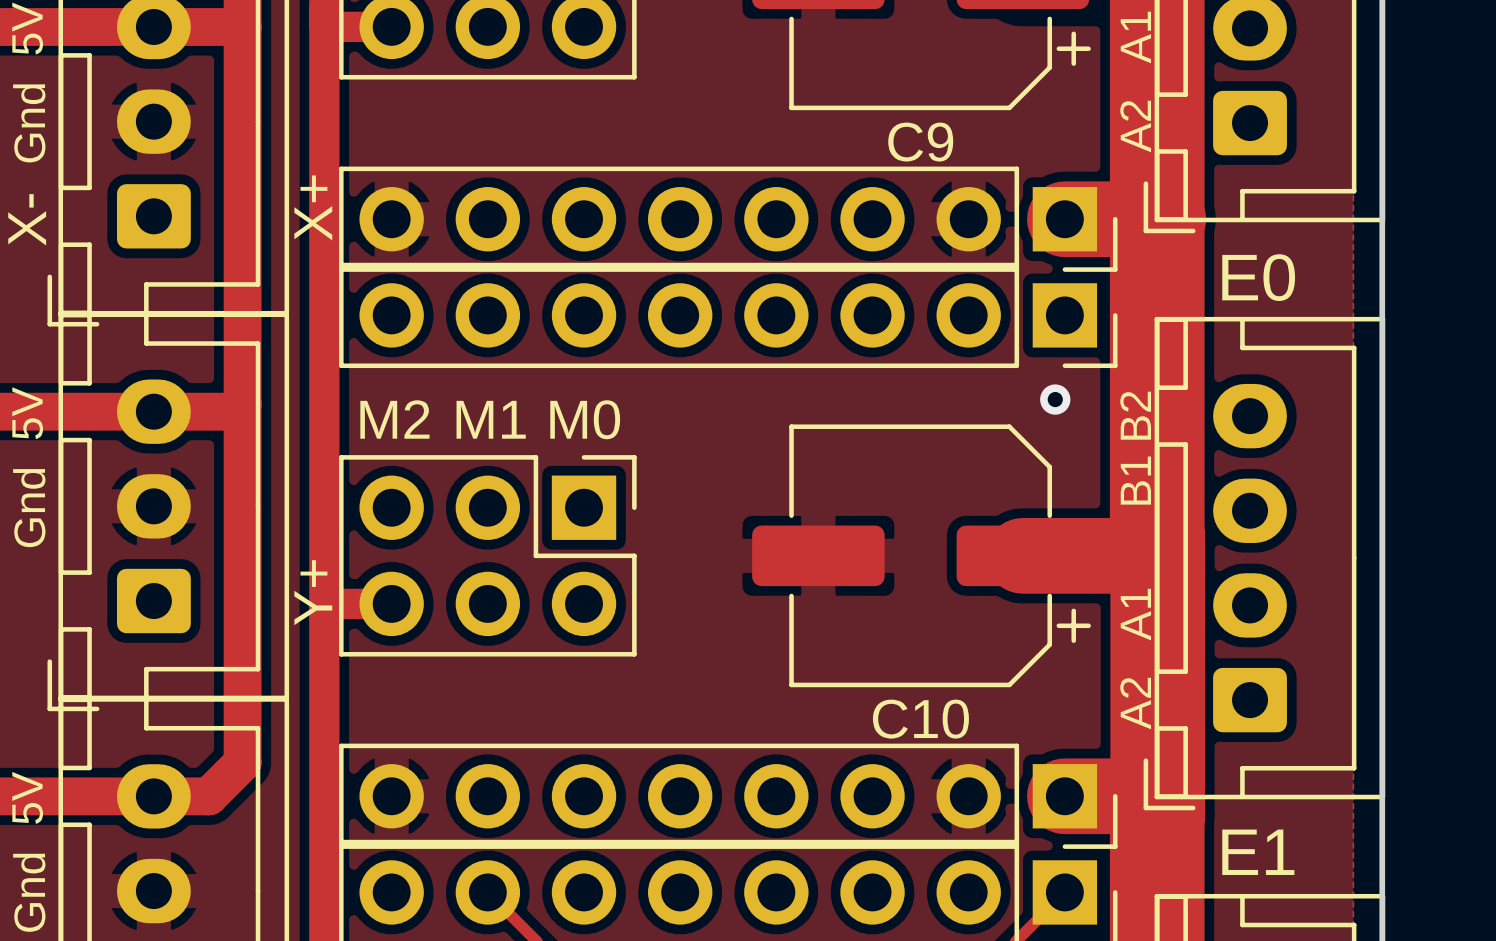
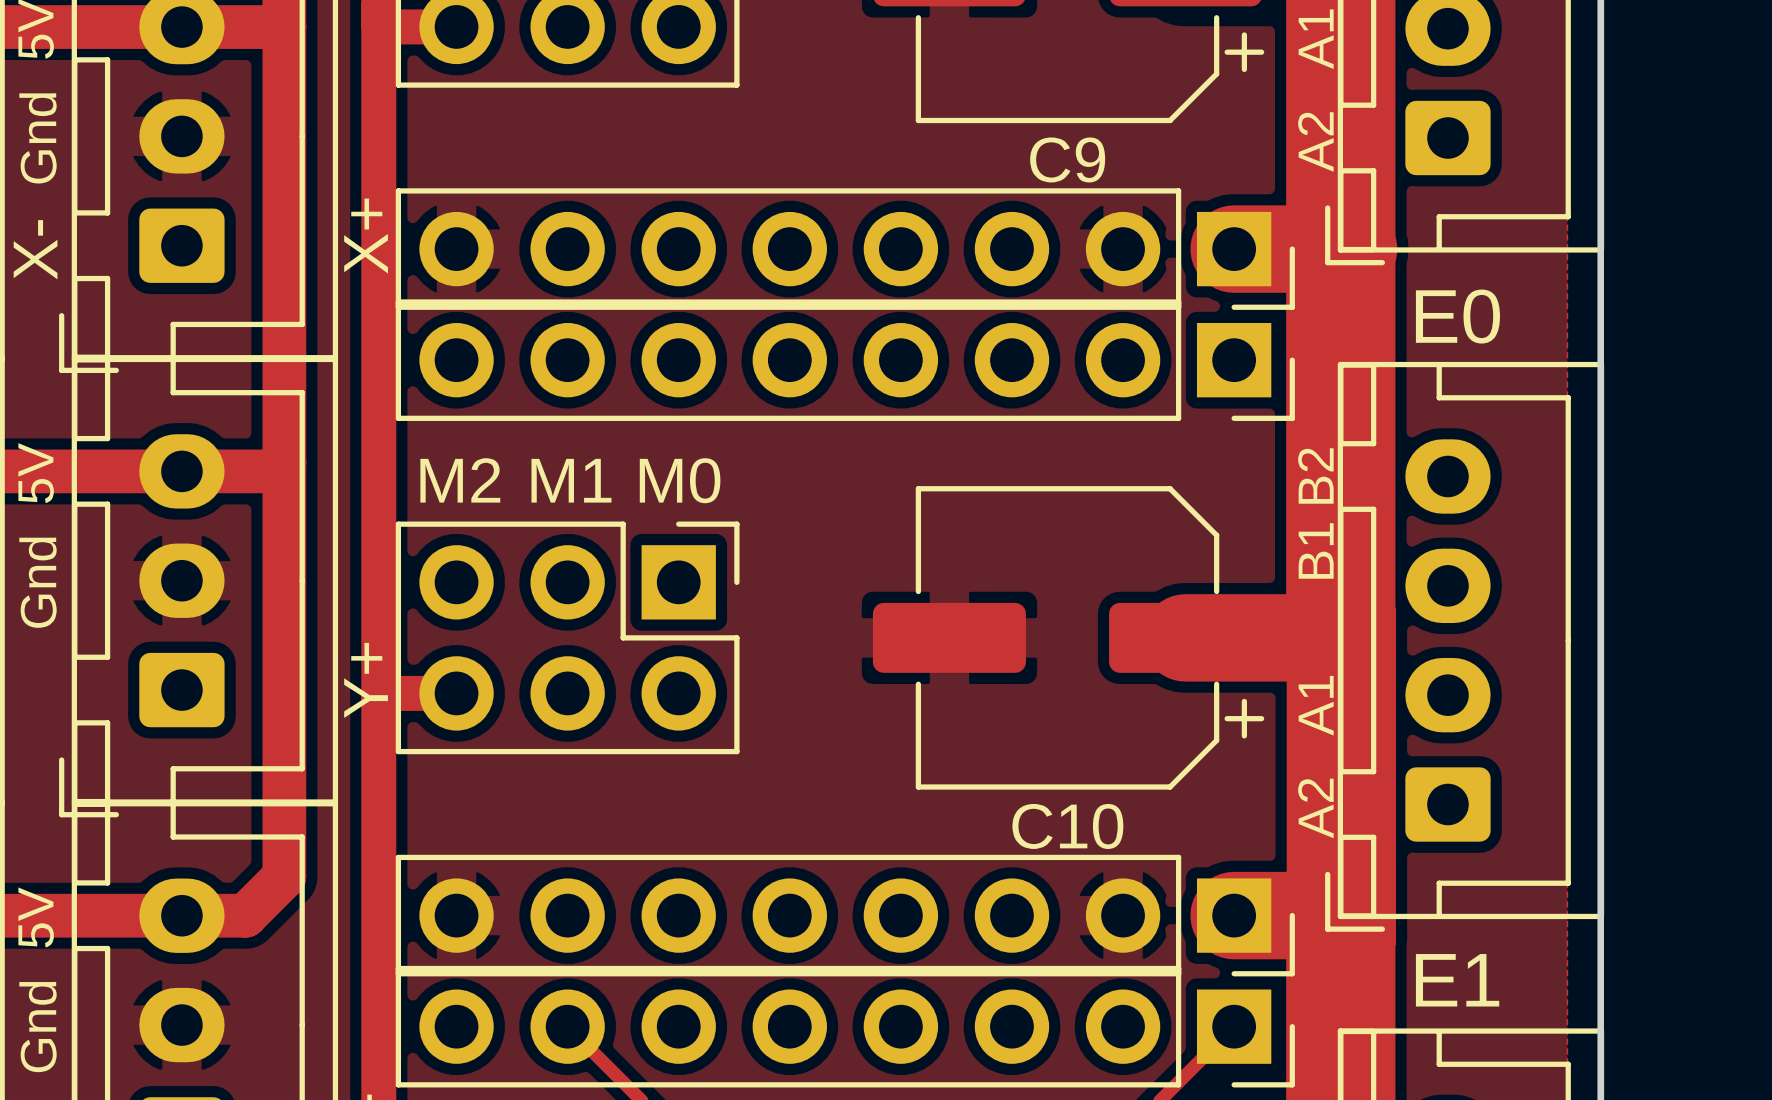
via: (1055, 399) -> none

